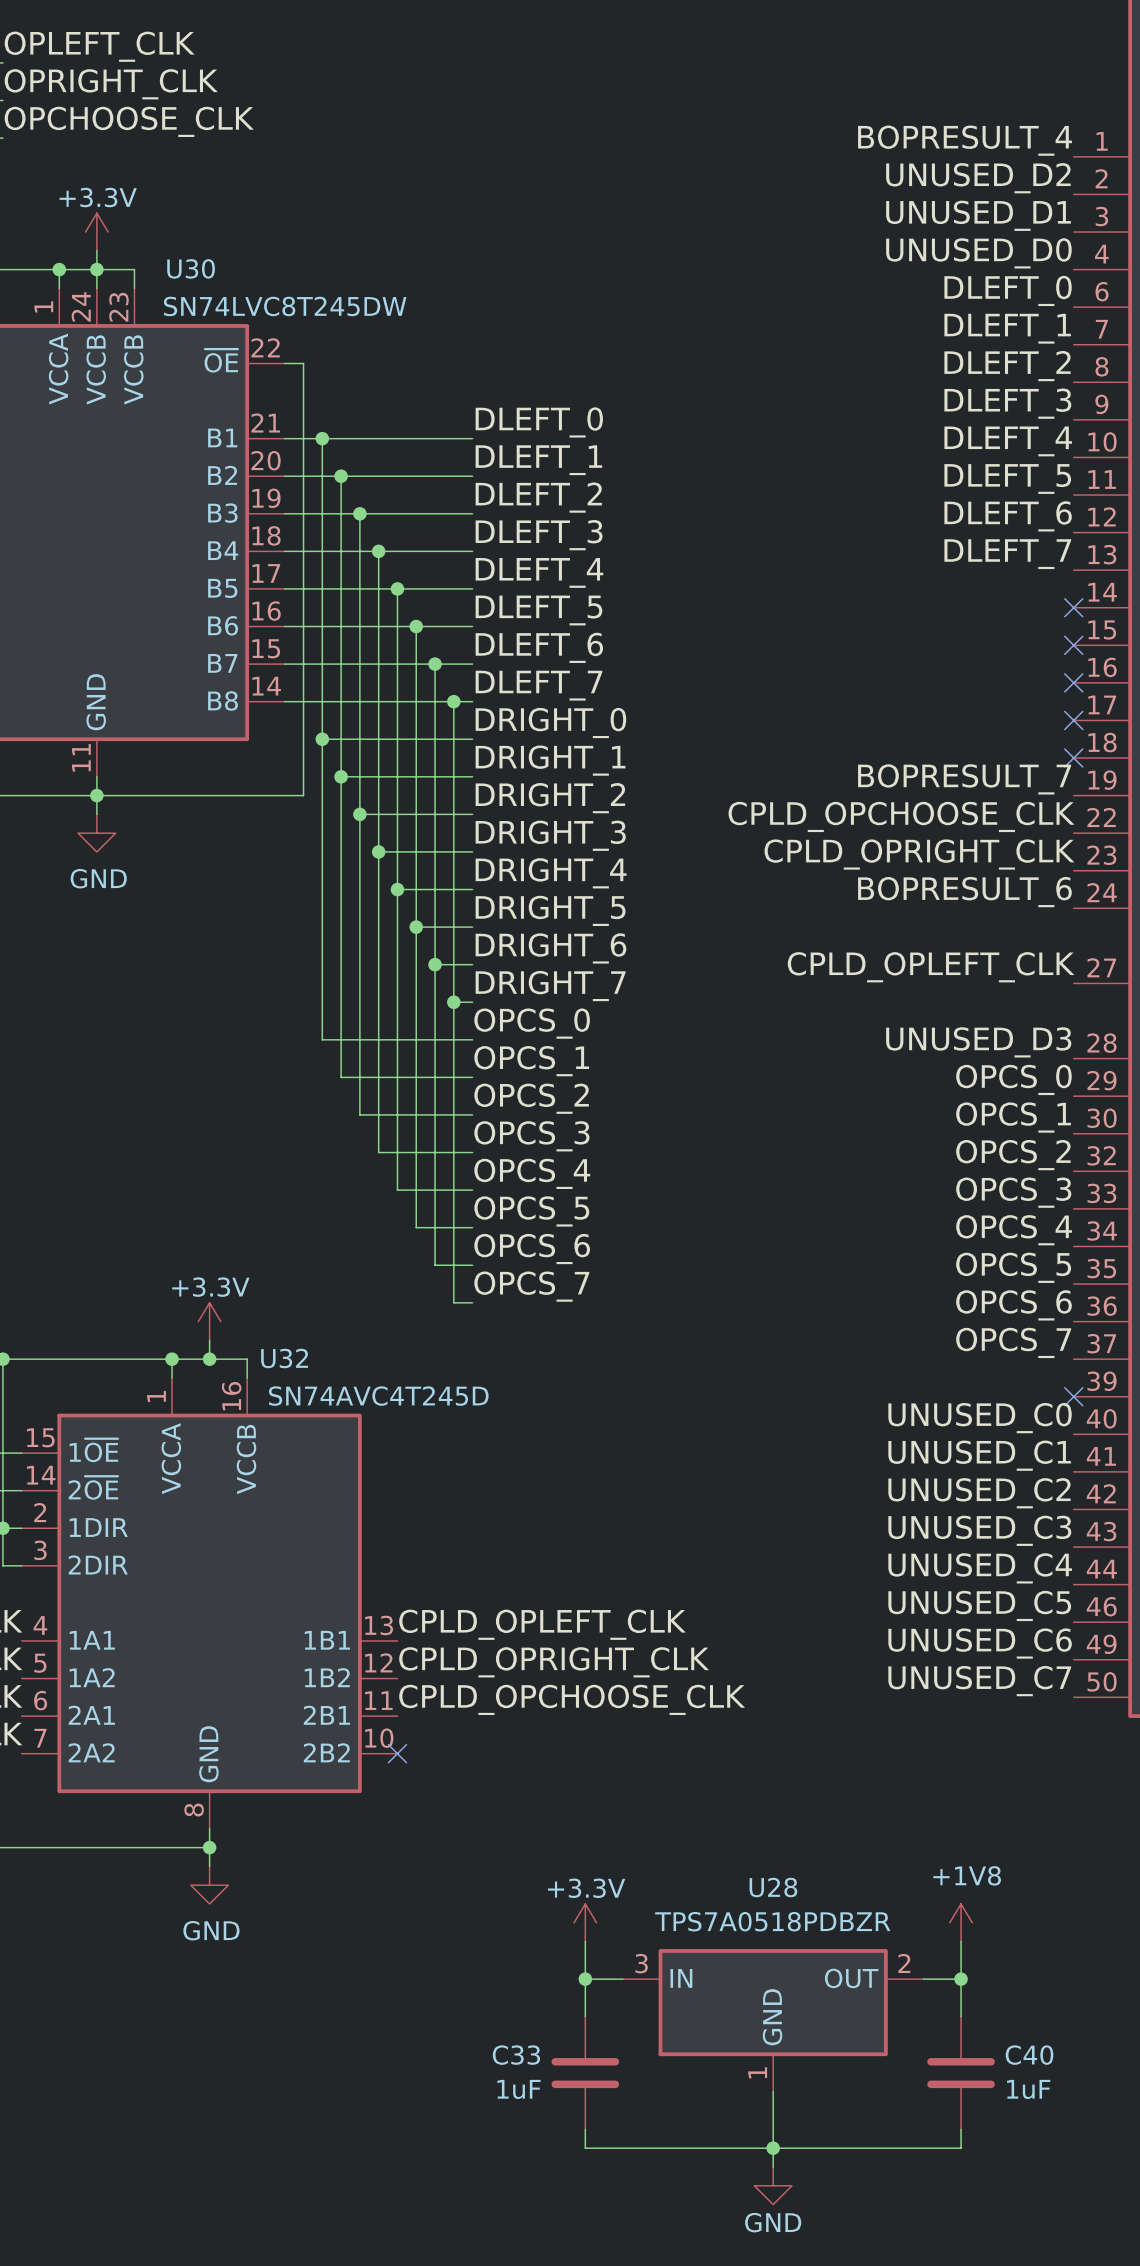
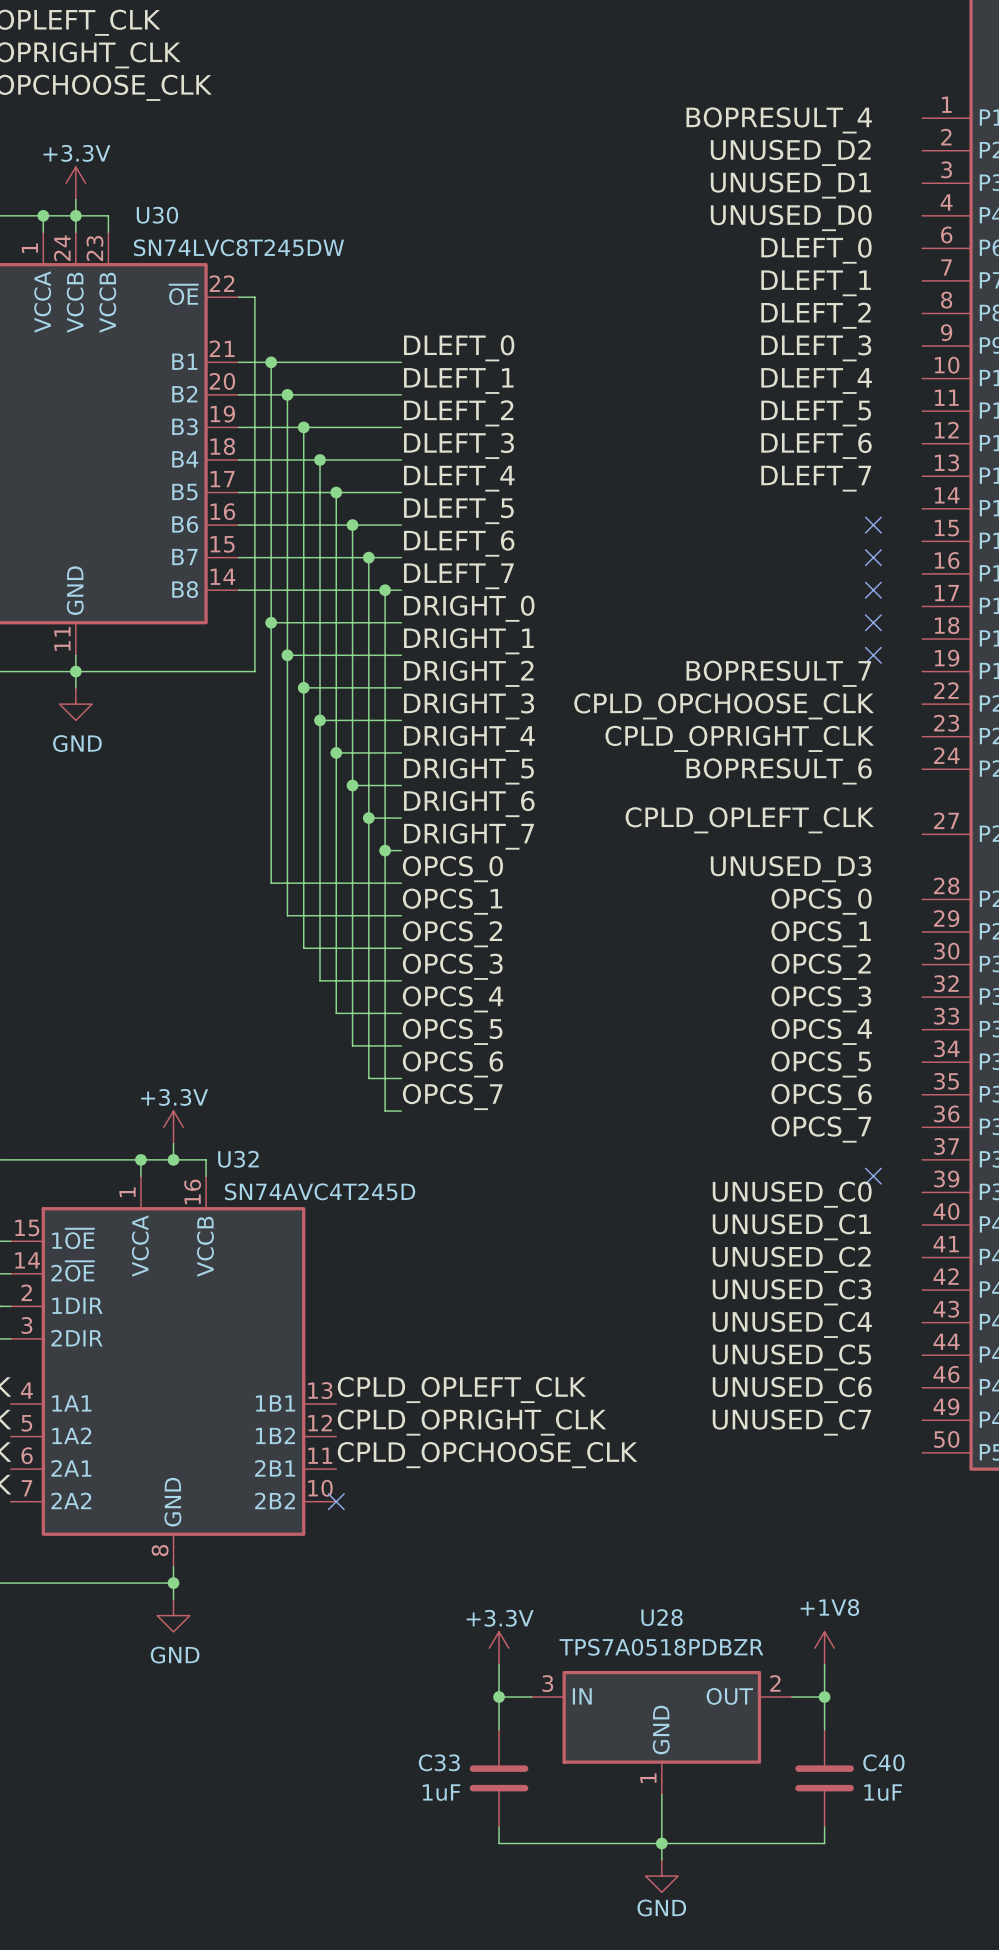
label position: BOPRESULT_4 (965, 140) -> BOPRESULT_4 (779, 120)
label position: UNUSED_D2 (978, 178) -> UNUSED_D2 (790, 152)
label position: UNUSED_D1 (978, 215) -> UNUSED_D1 (790, 185)
label position: UNUSED_D0 (978, 253) -> UNUSED_D0 (791, 218)
label position: DLEFT_0 (1008, 290) -> DLEFT_0 (816, 250)
label position: DLEFT_1 (1007, 328) -> DLEFT_1 (816, 283)
label position: DLEFT_2 (1007, 366) -> DLEFT_2 (816, 315)
label position: DLEFT_3 (1007, 403) -> DLEFT_3 (816, 348)
label position: DLEFT_4 (1008, 441) -> DLEFT_4 (816, 380)
label position: DLEFT_5 (1007, 479) -> DLEFT_5 (816, 413)
label position: DLEFT_6 (1008, 516) -> DLEFT_6 (816, 445)
label position: DLEFT_7 (1007, 554) -> DLEFT_7 (816, 478)
no-connect mark: (1073, 607) -> none
no-connect mark: none -> (873, 525)
no-connect mark: (1073, 645) -> none
no-connect mark: none -> (873, 557)
no-connect mark: (1073, 682) -> none
no-connect mark: none -> (873, 590)
no-connect mark: (1073, 720) -> none
no-connect mark: none -> (873, 622)
no-connect mark: (1073, 758) -> none
no-connect mark: none -> (873, 655)
label position: BOPRESULT_7 (964, 779) -> BOPRESULT_7 (778, 673)
label position: CPLD_OPCHOOSE_CLK (901, 816) -> CPLD_OPCHOOSE_CLK (724, 706)
label position: CPLD_OPRIGHT_CLK (919, 854) -> CPLD_OPRIGHT_CLK (739, 738)
label position: BOPRESULT_6 (964, 892) -> BOPRESULT_6 (779, 771)
label position: CPLD_OPLEFT_CLK (931, 967) -> CPLD_OPLEFT_CLK (749, 820)
label position: UNUSED_D3 (978, 1042) -> UNUSED_D3 (791, 869)
label position: OPCS_0 (1013, 1079) -> OPCS_0 (821, 901)
label position: OPCS_1 (1013, 1117) -> OPCS_1 (821, 934)
label position: OPCS_2 (1013, 1155) -> OPCS_2 (821, 966)
label position: OPCS_3 (1013, 1192) -> OPCS_3 (821, 999)
label position: OPCS_4 (1014, 1230) -> OPCS_4 (821, 1031)
label position: OPCS_5 (1013, 1267) -> OPCS_5 (821, 1064)
label position: OPCS_6 (1013, 1305) -> OPCS_6 (821, 1096)
label position: OPCS_7 (1013, 1342) -> OPCS_7 (821, 1129)
no-connect mark position: (1073, 1396) -> (873, 1176)
label position: UNUSED_C0 (980, 1418) -> UNUSED_C0 (792, 1194)
label position: UNUSED_C1 (979, 1455) -> UNUSED_C1 (791, 1227)
label position: UNUSED_C2 (979, 1493) -> UNUSED_C2 (791, 1259)
label position: UNUSED_C3 (979, 1530) -> UNUSED_C3 (792, 1292)
label position: UNUSED_C4 (980, 1568) -> UNUSED_C4 (792, 1324)
label position: UNUSED_C5 (979, 1605) -> UNUSED_C5 (791, 1357)
label position: UNUSED_C6 (980, 1643) -> UNUSED_C6 (792, 1389)
label position: UNUSED_C7 (979, 1681) -> UNUSED_C7 (791, 1422)

